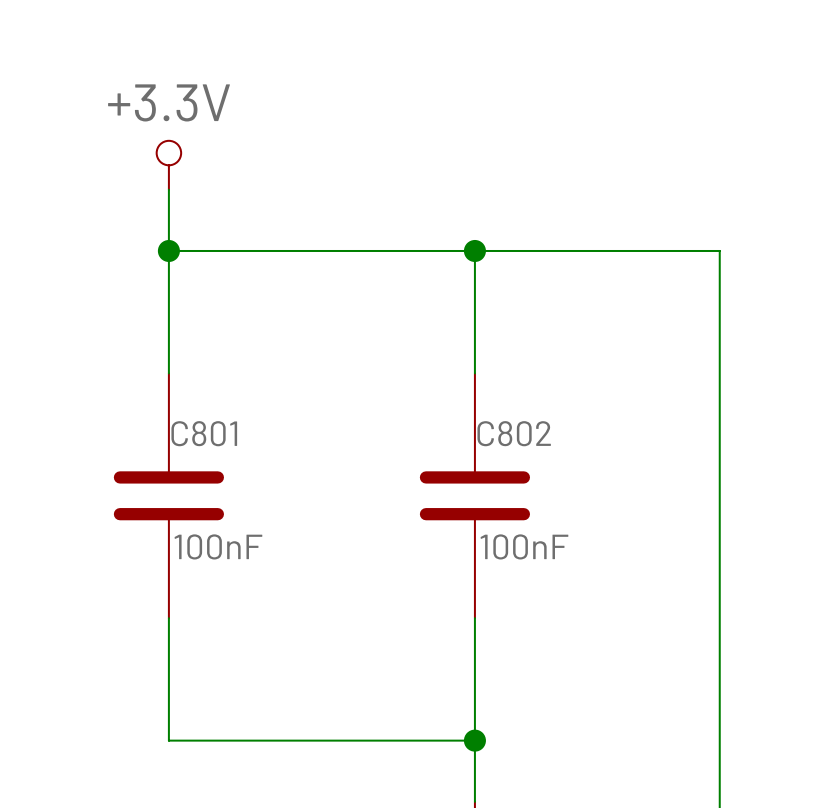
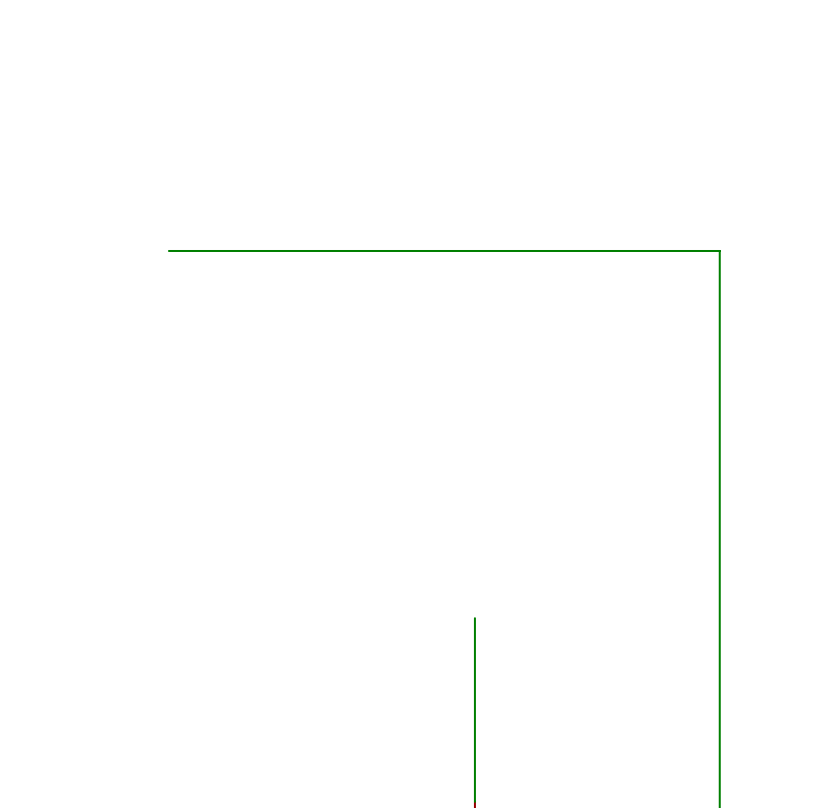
power symbol: +3.3V (168, 165) -> none
wire: (168, 189) (168, 373) -> none
junction: (168, 250) -> none
wire: (474, 250) (474, 373) -> none
junction: (474, 250) -> none
C801: 100nF (168, 495) -> none
C802: 100nF (474, 495) -> none
wire: (168, 618) (168, 740) (474, 740) -> none
junction: (474, 740) -> none

